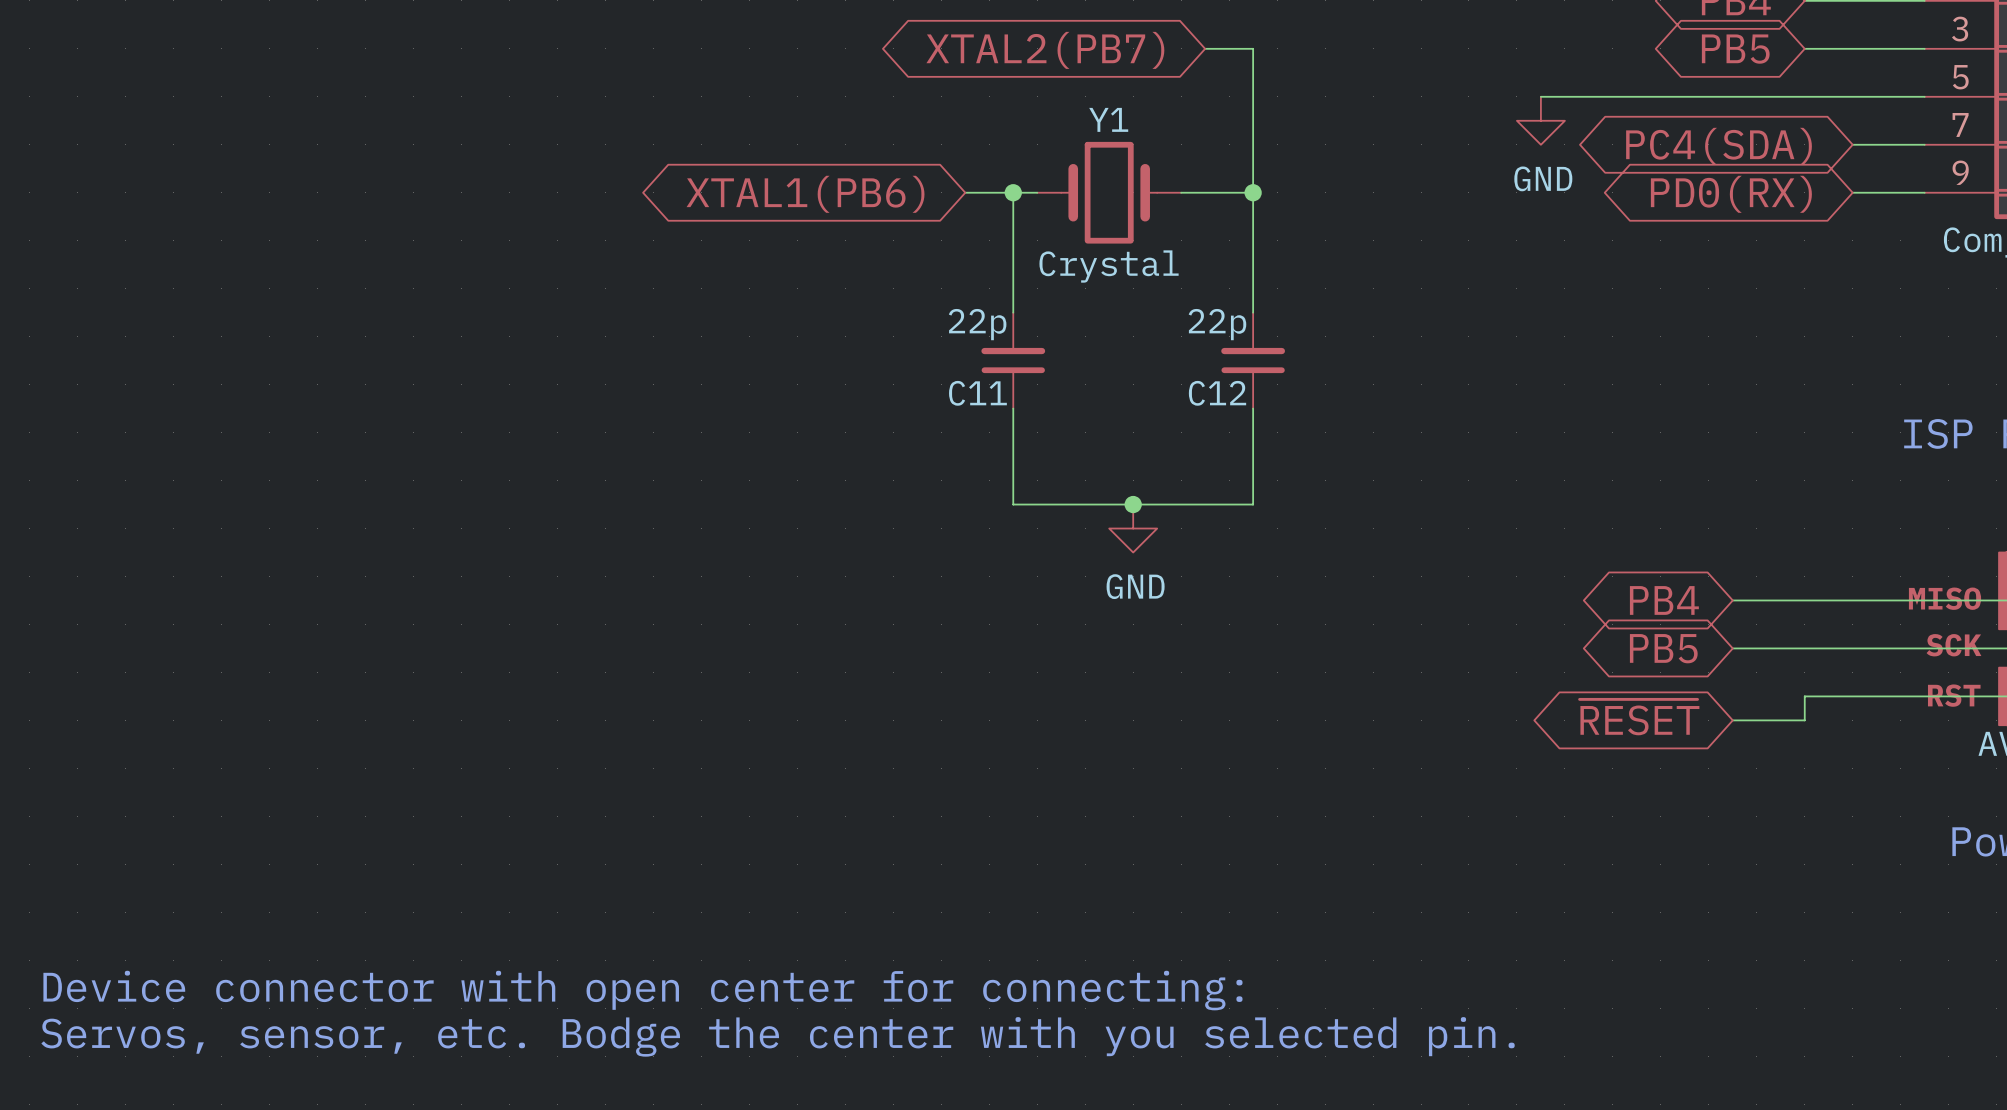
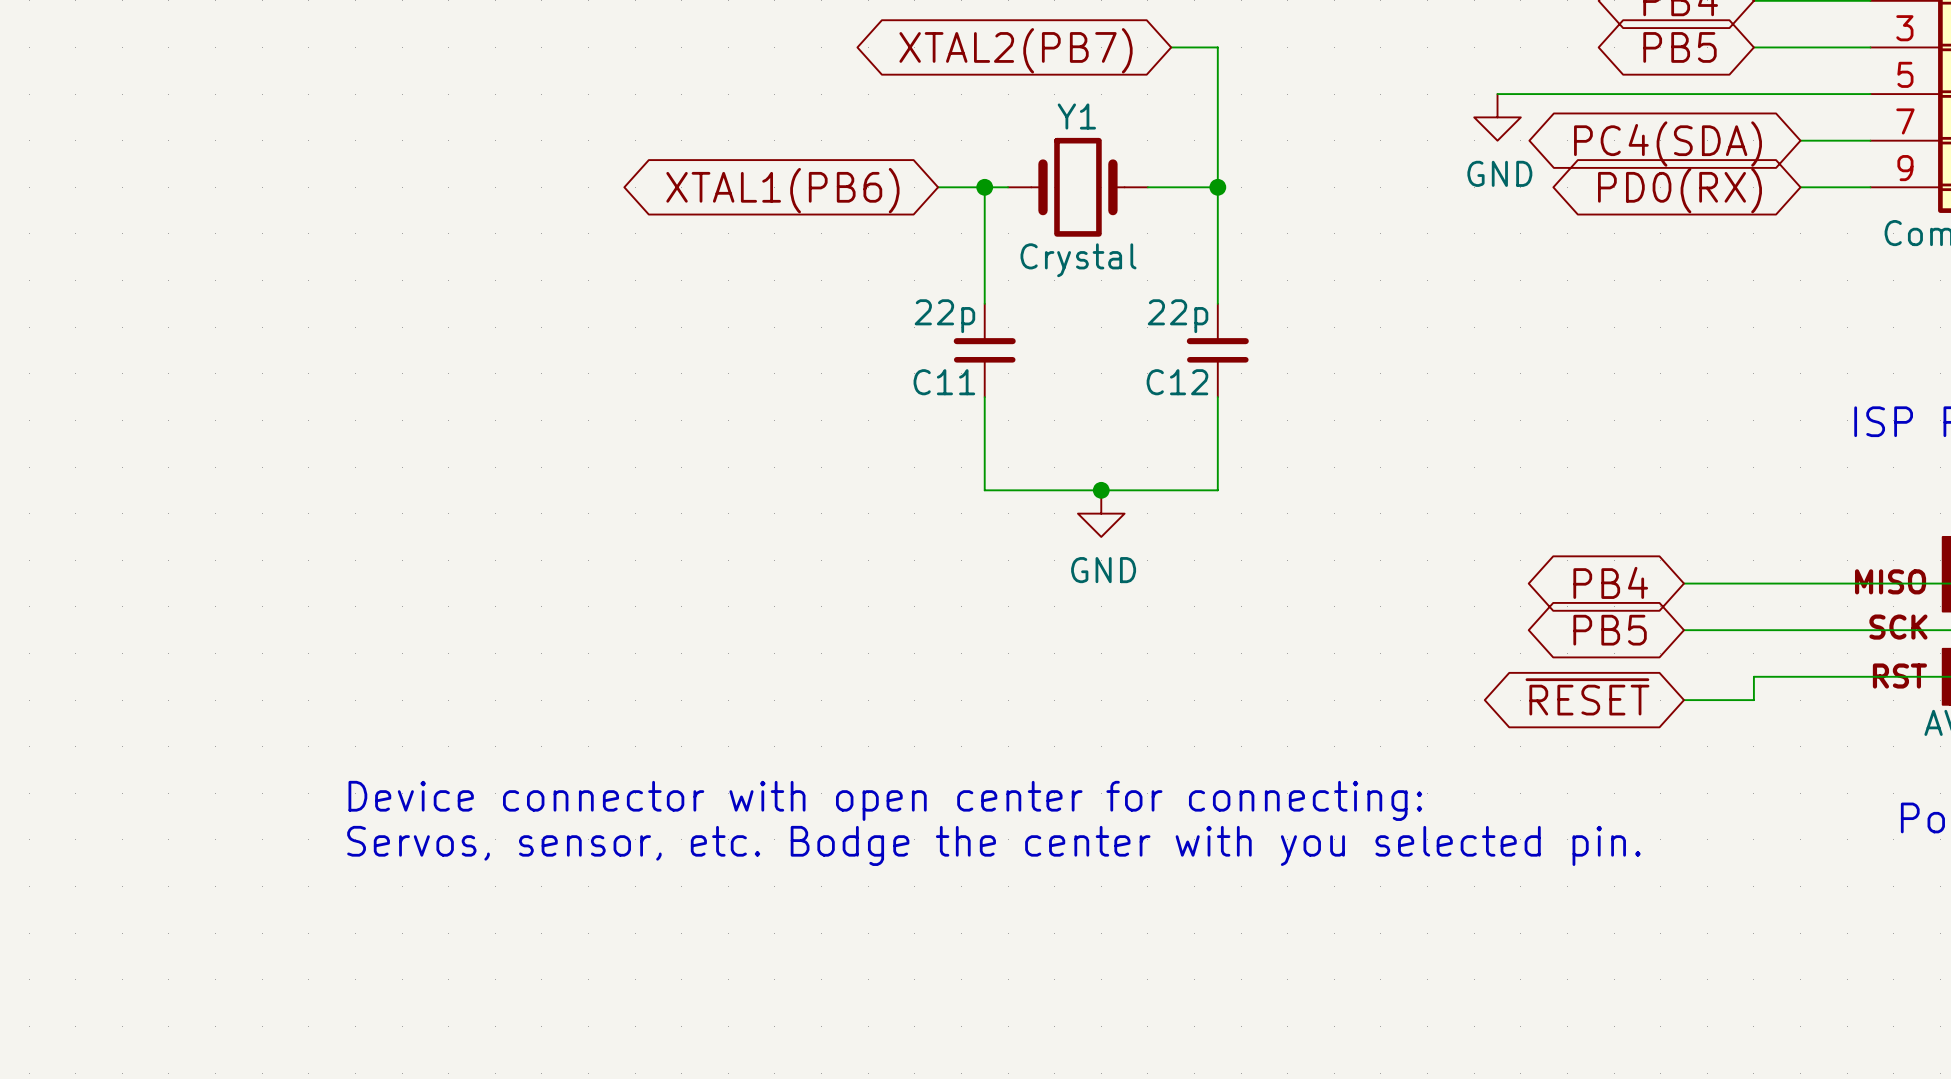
text position: Device connector with open center for connecting: (642, 990) -> Device connector with open center for connecting: (885, 800)
text position: Servos, sensor, etc. Bodge the center with you selected pin. (778, 1036) -> Servos, sensor, etc. Bodge the center with you selected pin. (993, 845)

